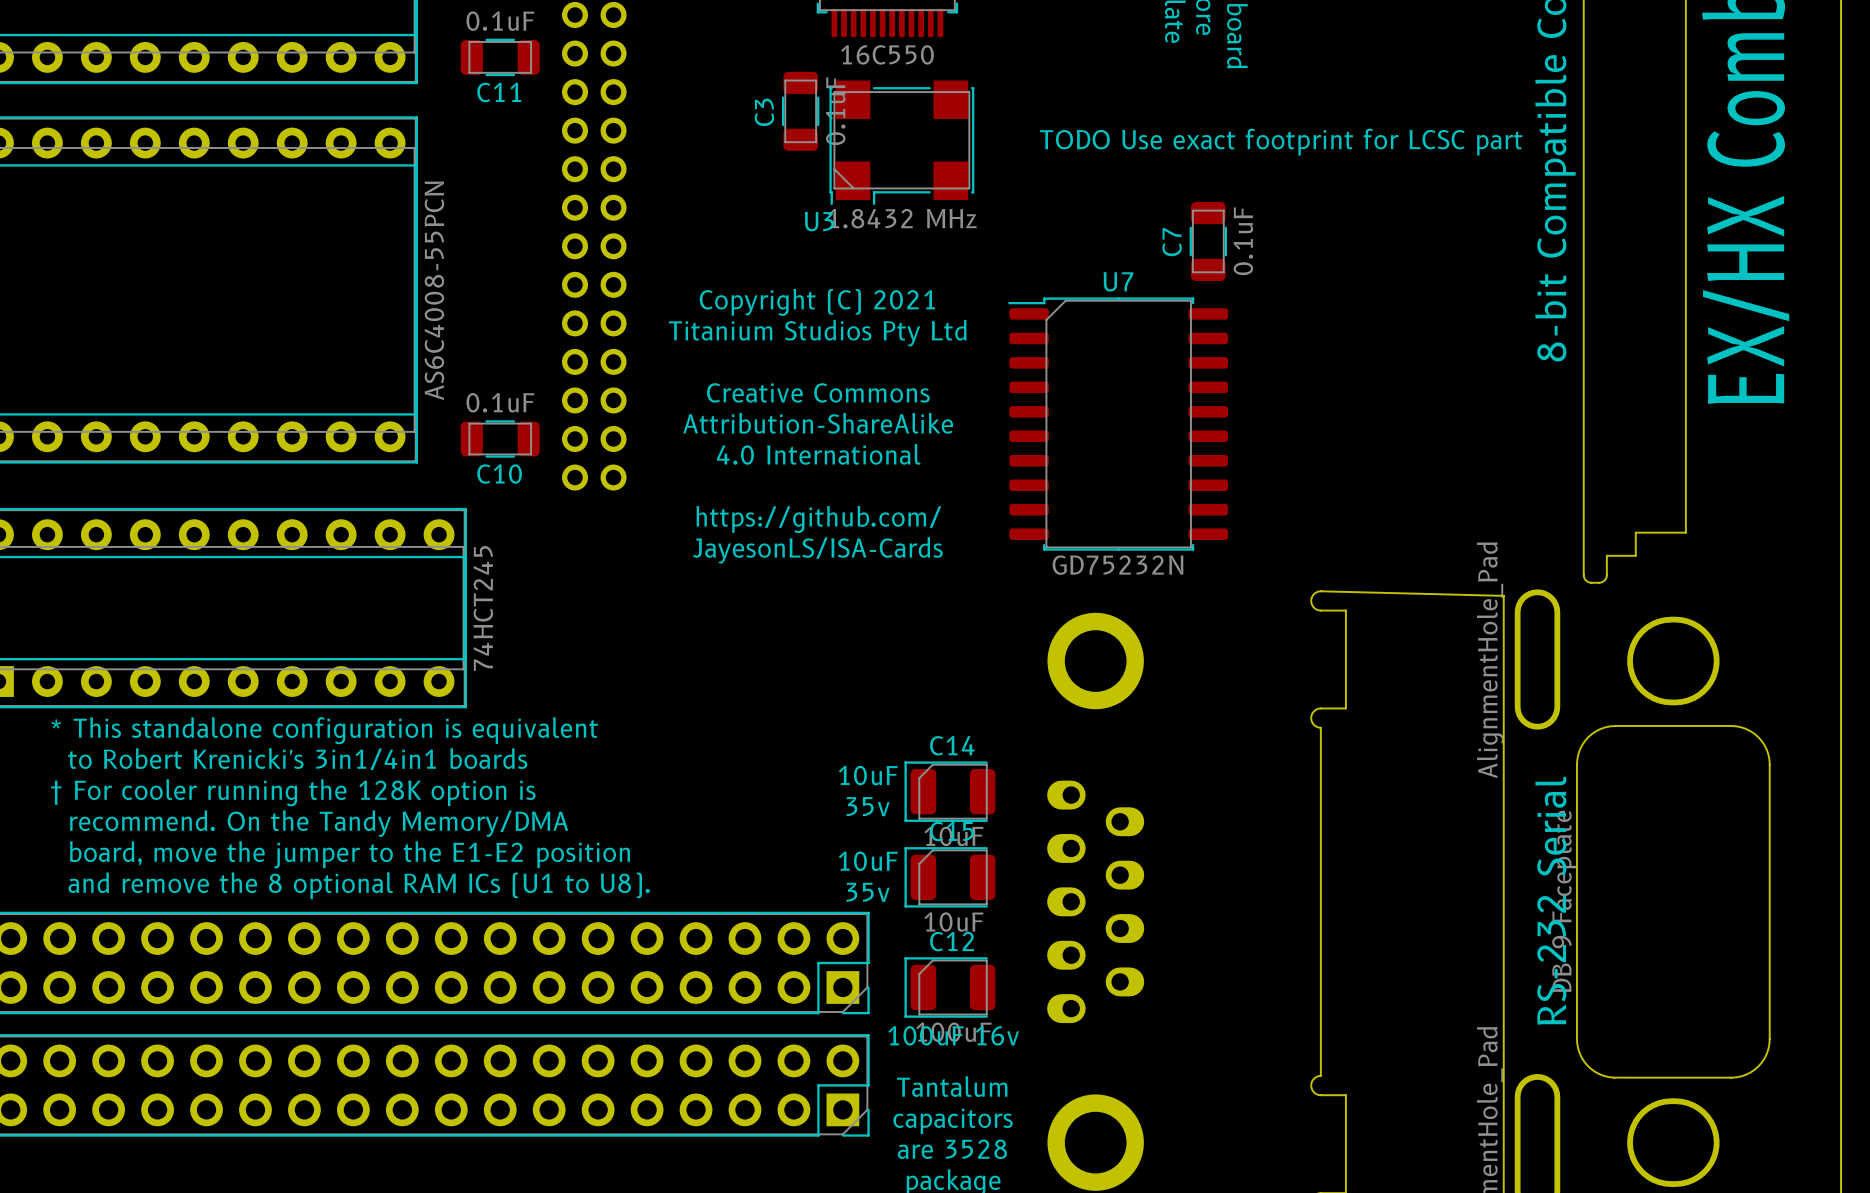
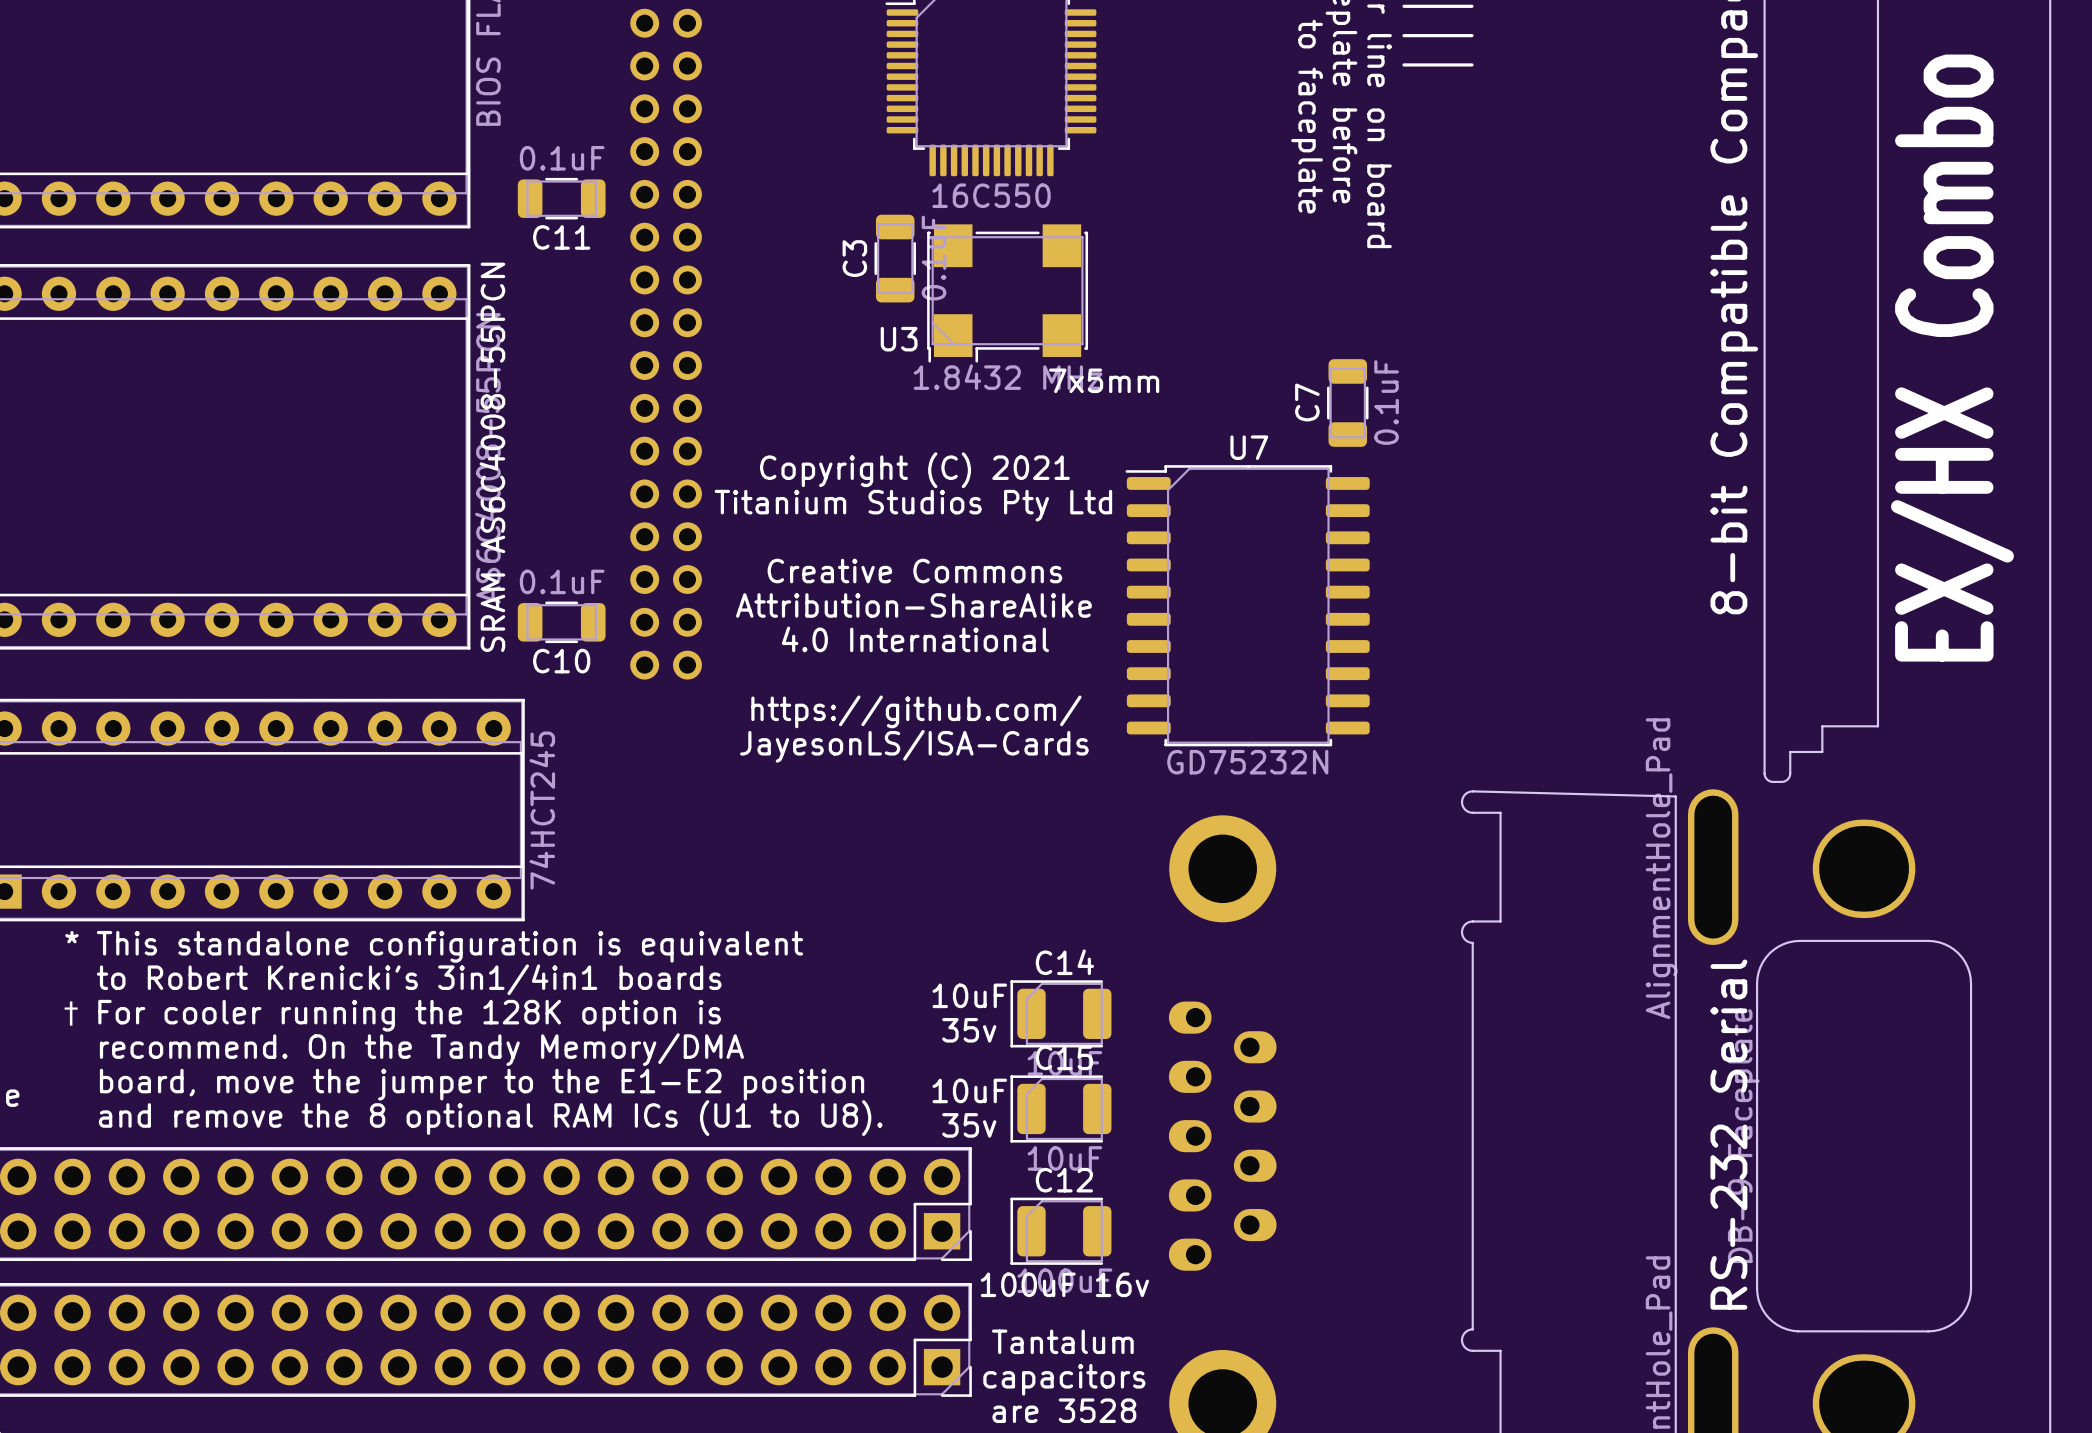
U3 text: TODO Use exact footprint for LCSC part (1281, 142) -> none
U3 name position: U3 (819, 221) -> U3 (899, 339)
U3 text: none -> 7x5mm (1104, 380)
part text: none -> SRAM AS6C4008-55PCN (492, 457)

